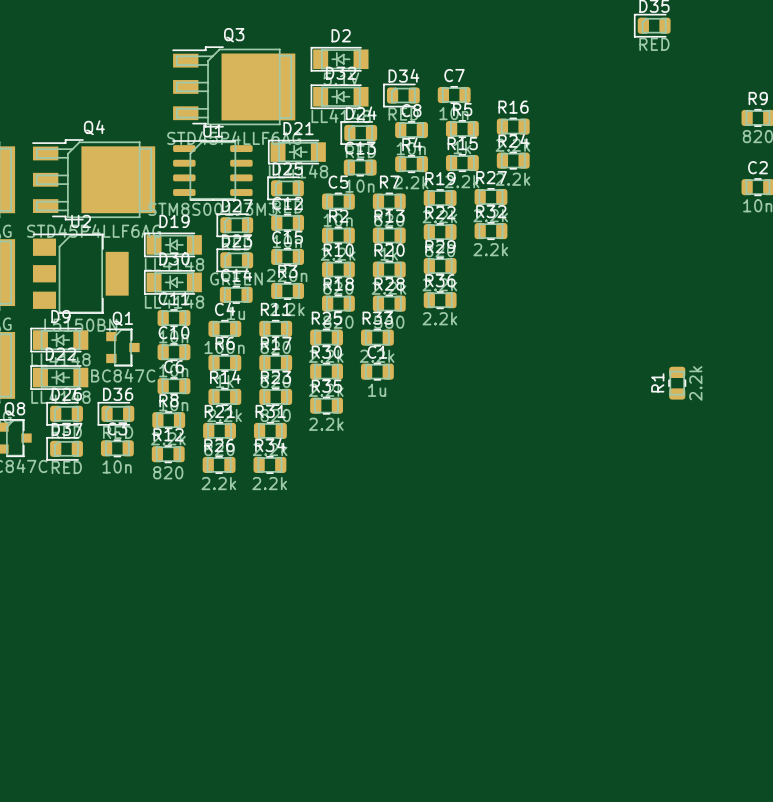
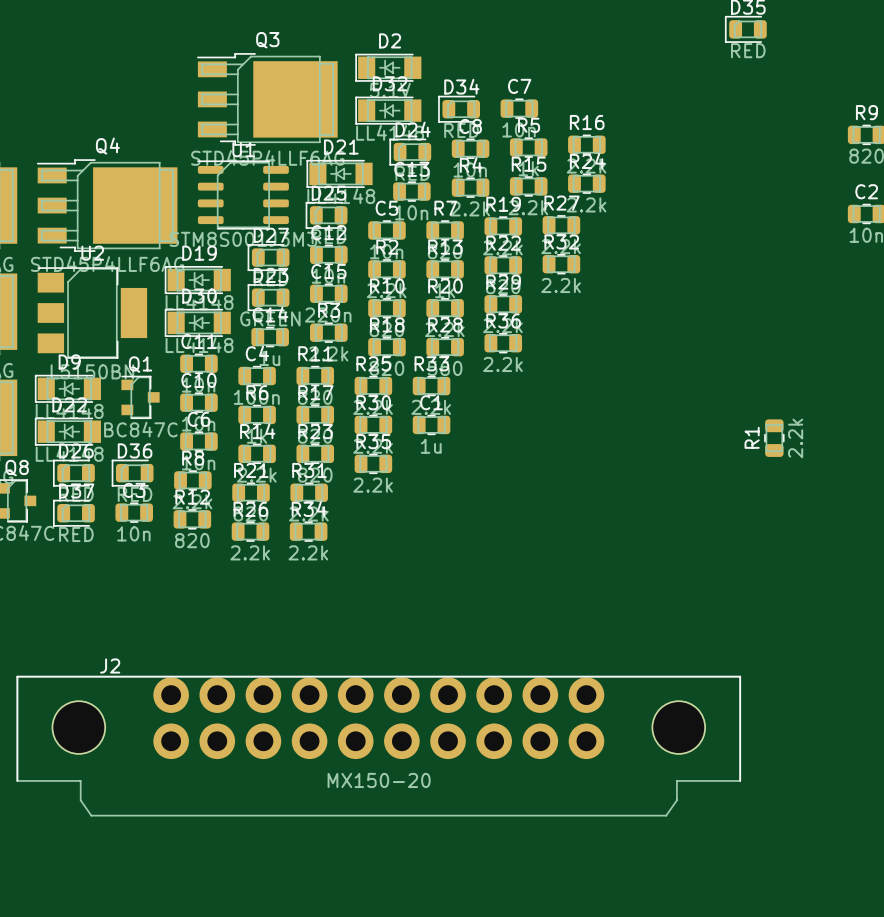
J2: none -> MX150-20 (378, 746)

